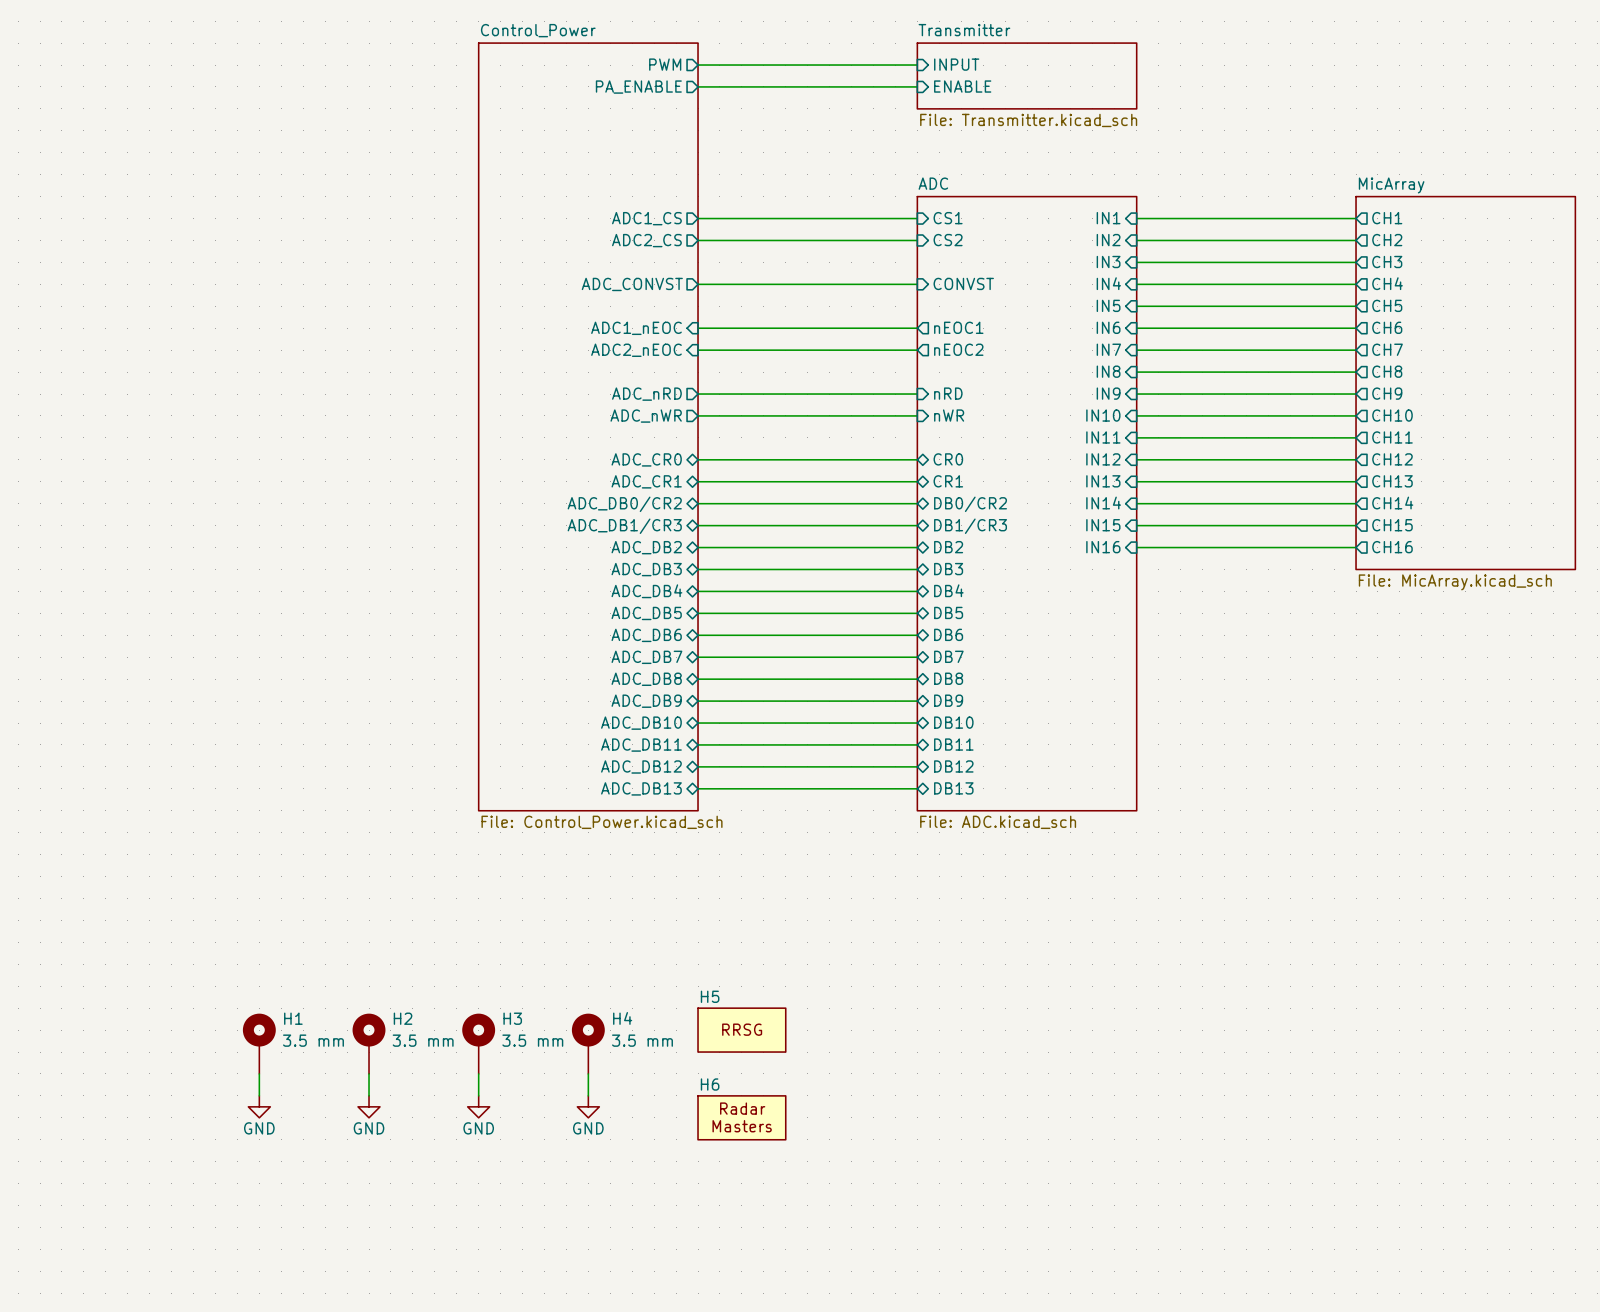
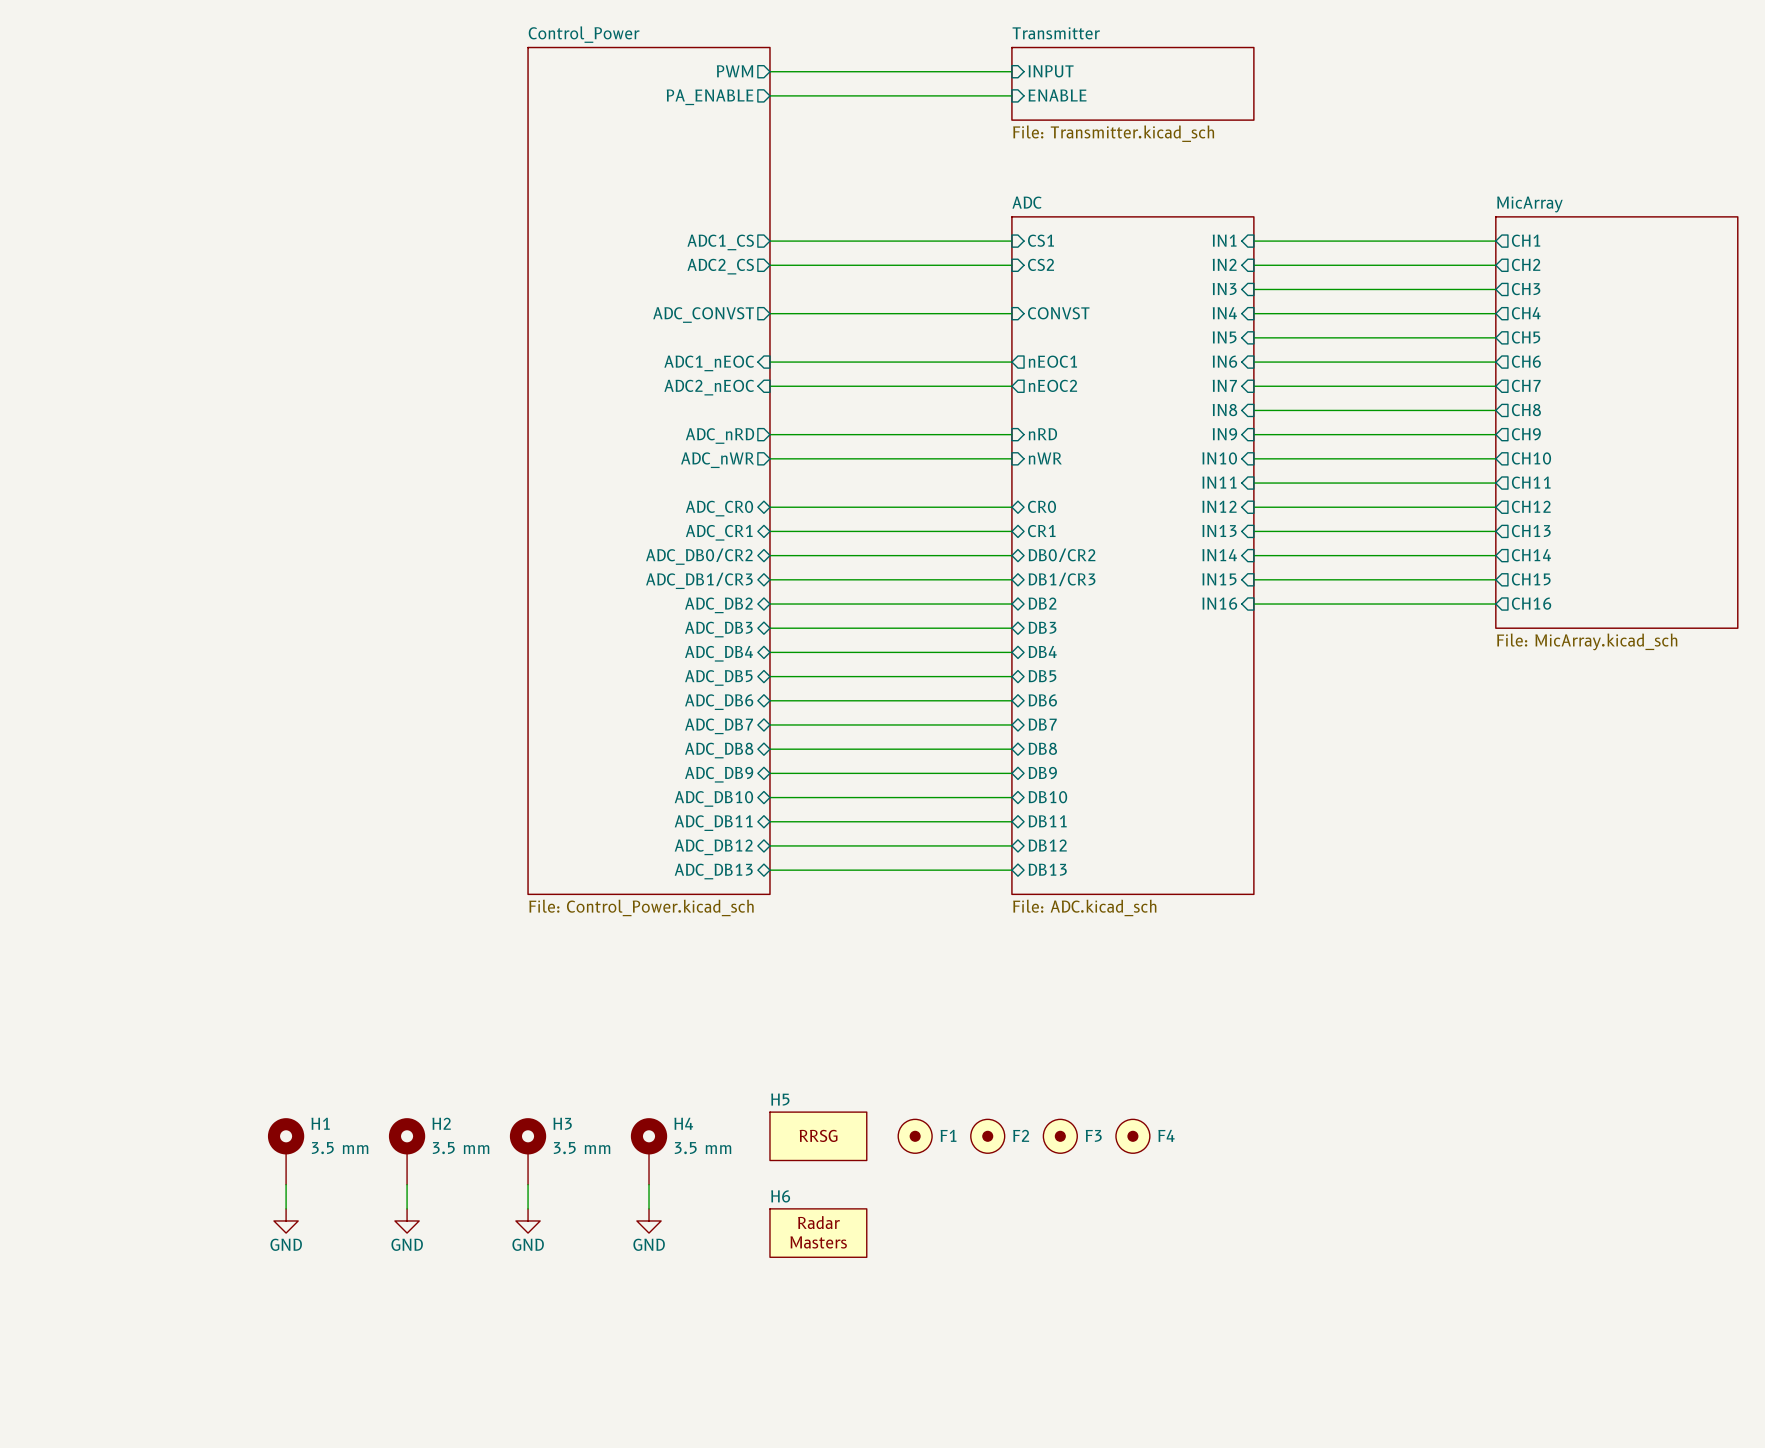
F1: none -> (915, 1136)
F2: none -> (987, 1136)
F3: none -> (1060, 1136)
F4: none -> (1132, 1136)

